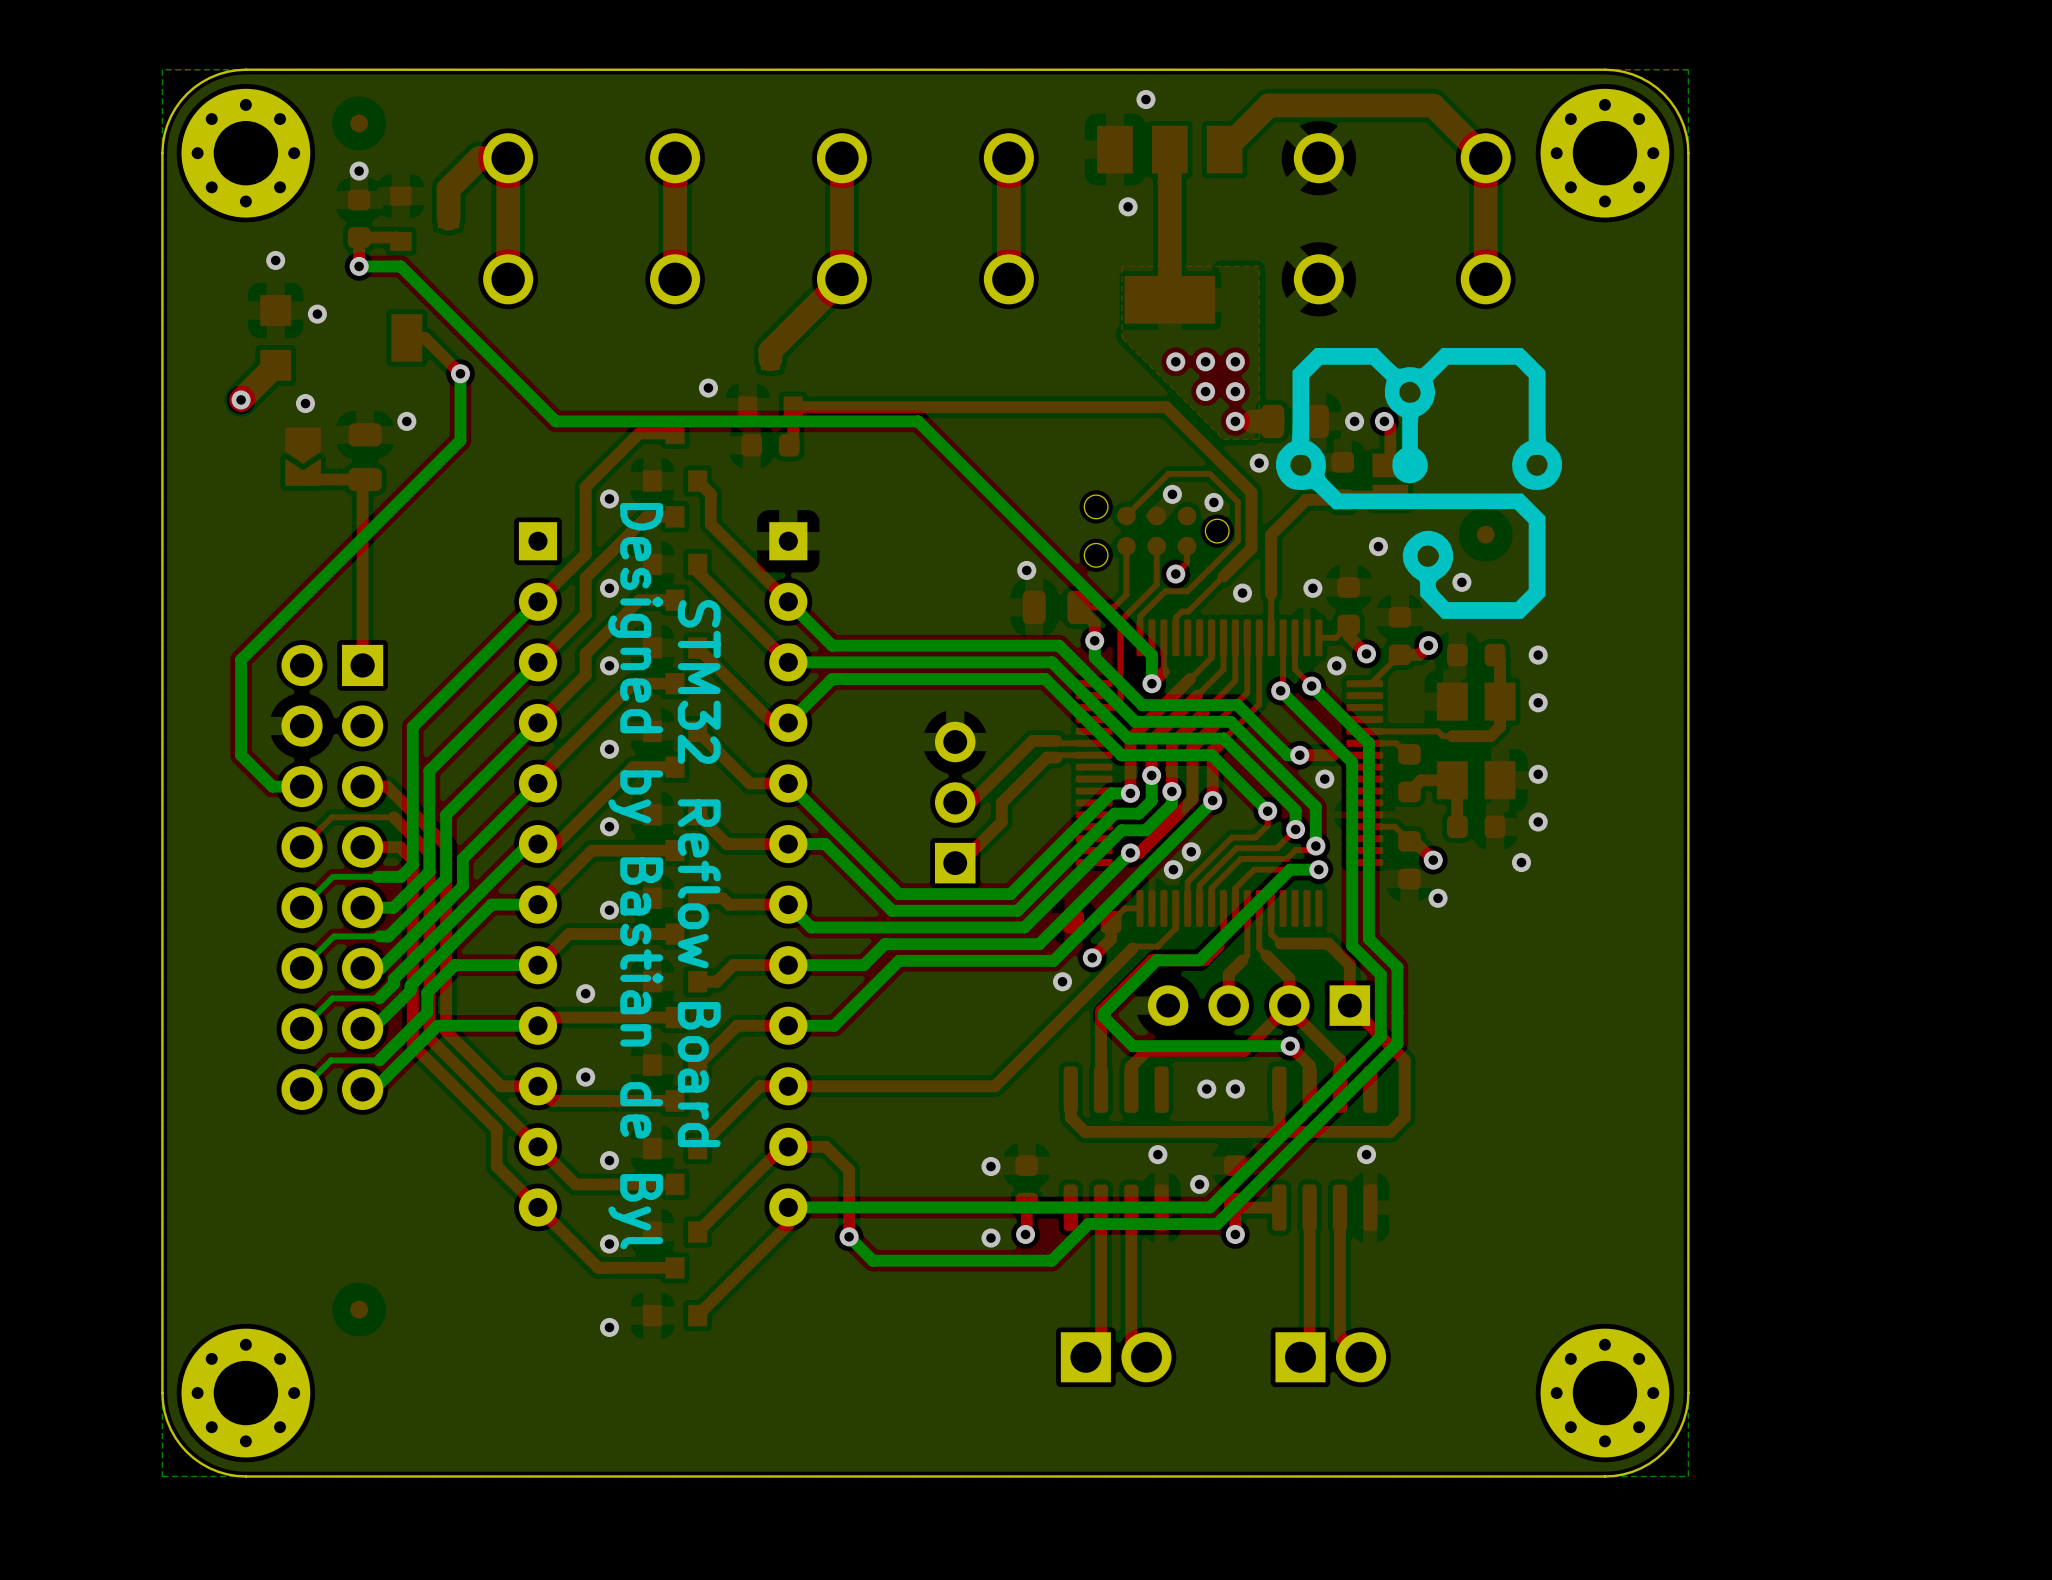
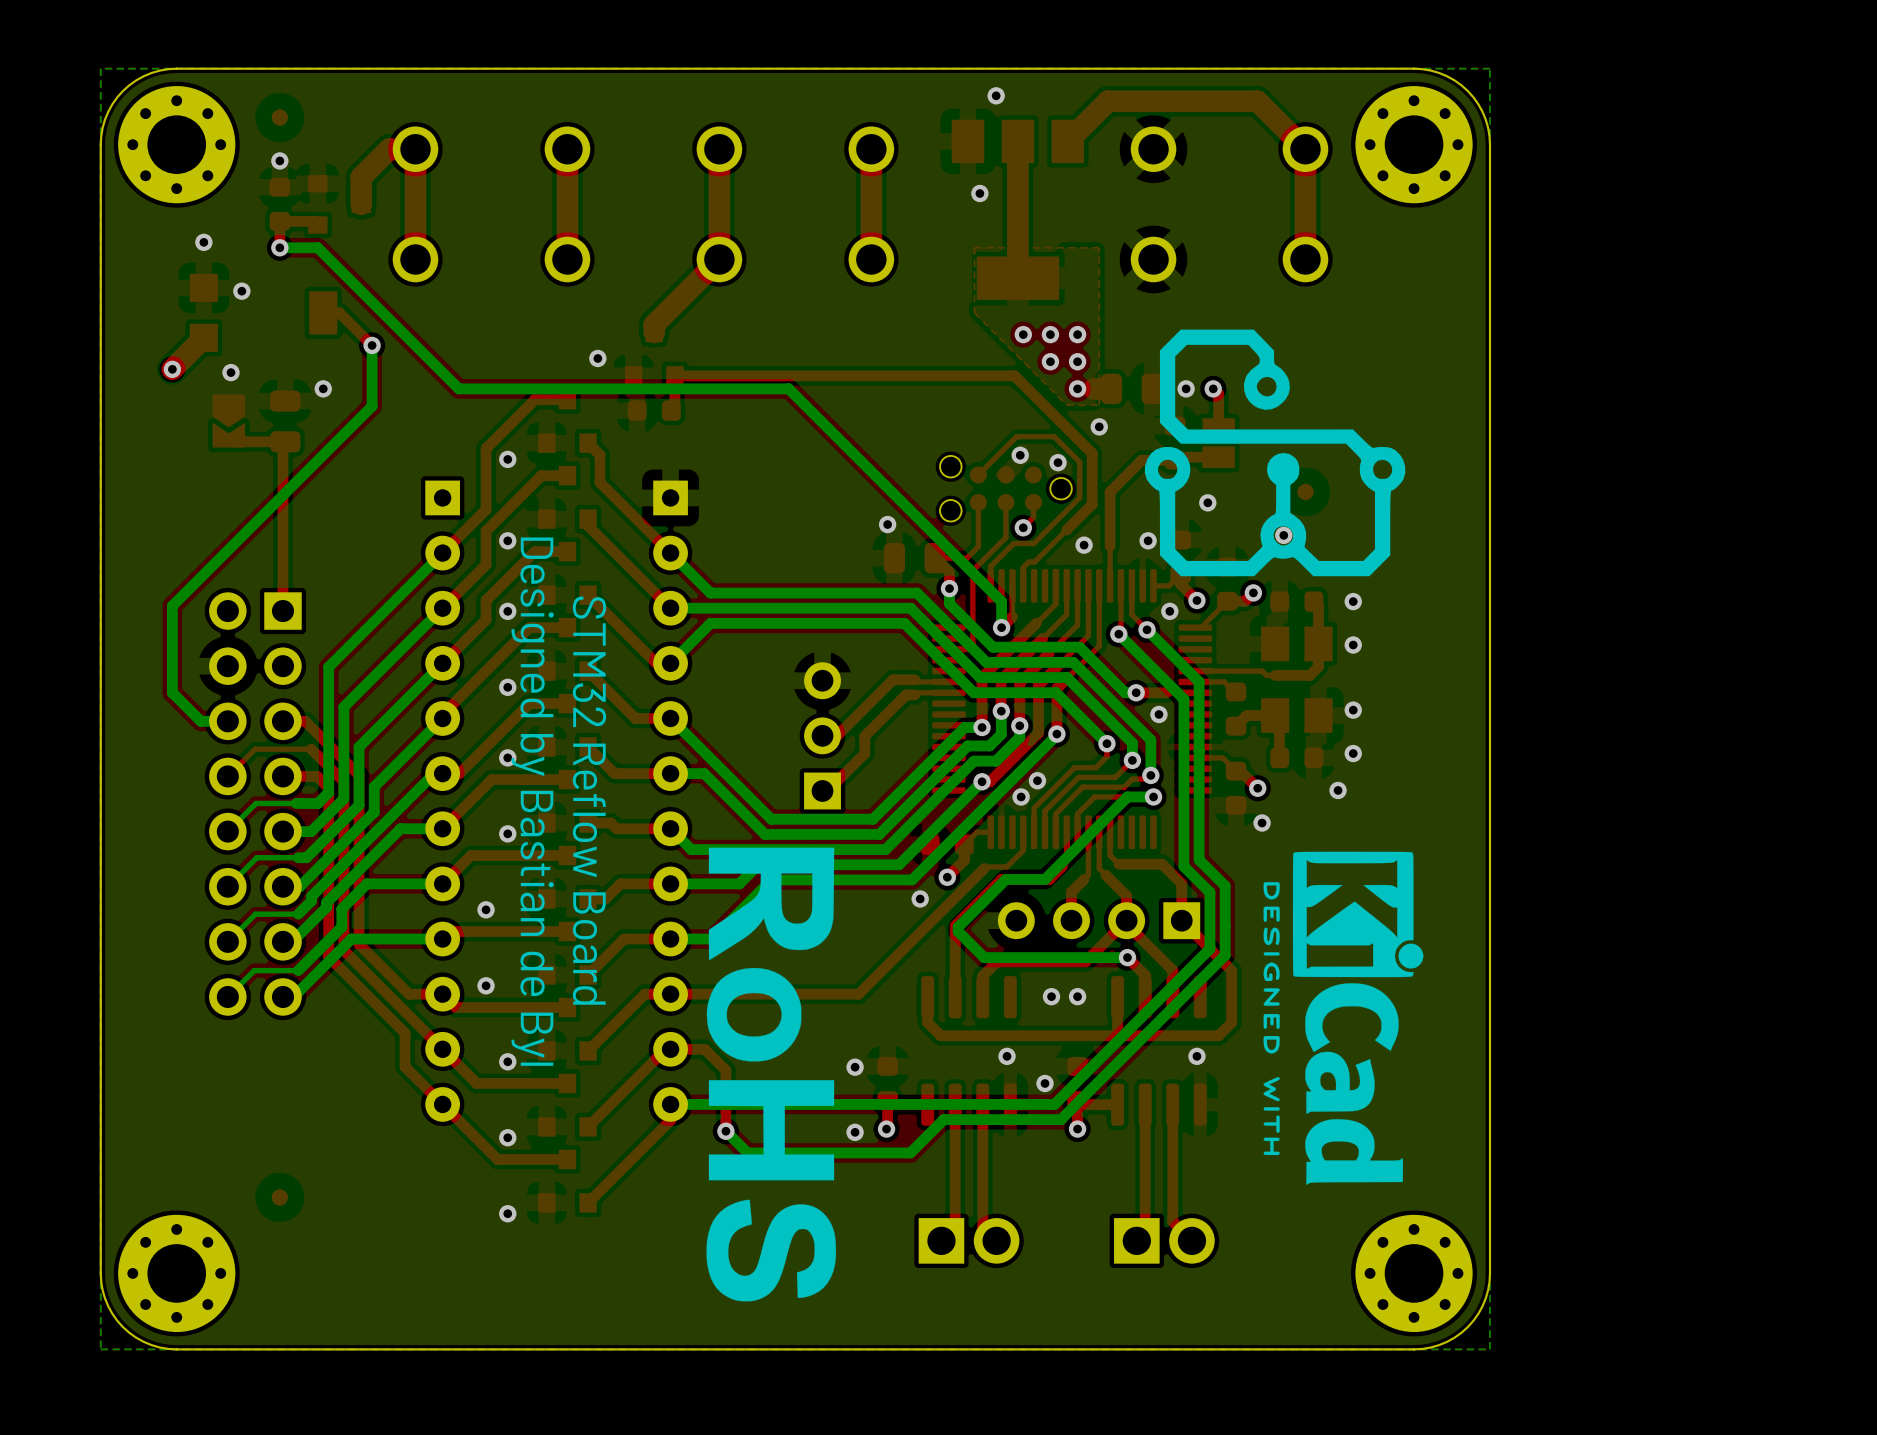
drawing: [1275, 347, 1563, 619] -> none
drawing: none -> [1144, 329, 1406, 577]
drawing: none -> [706, 847, 837, 1302]
drawing: none -> [1263, 851, 1424, 1185]

